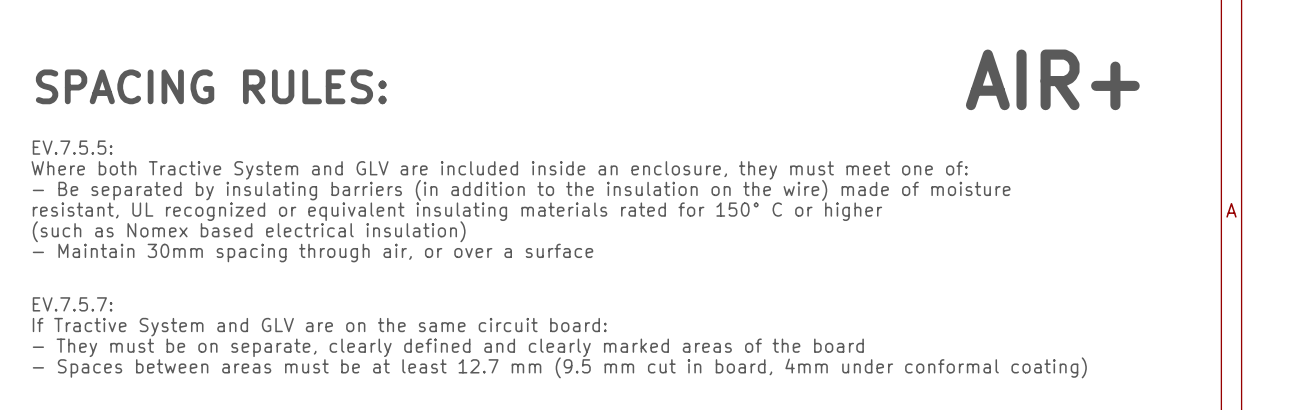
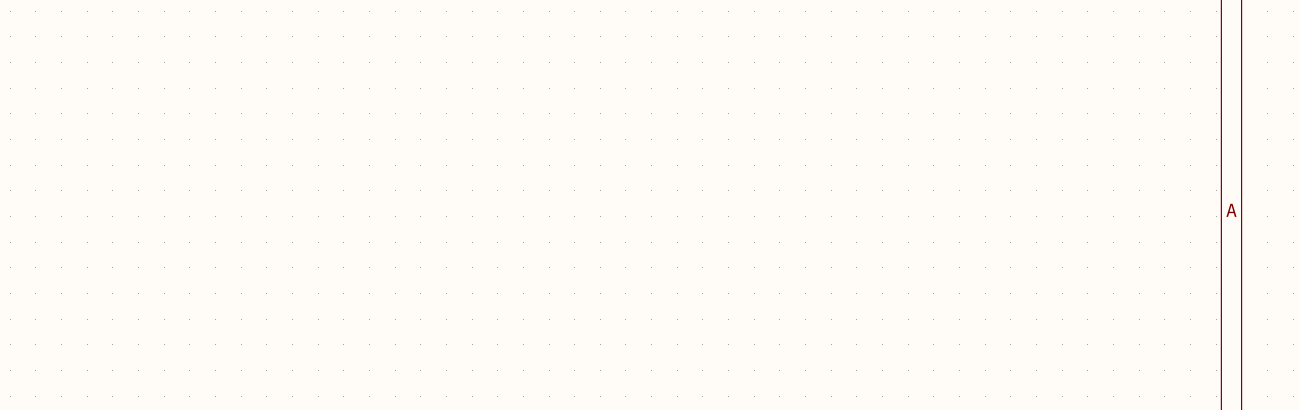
text: AIR+ (1052, 79) -> none
text: SPACING RULES: (211, 86) -> none
text: EV.7.5.5: (72, 147) -> none
text: Where both Tractive System and GLV are included inside an enclosure, they must meet one of: (499, 170) -> none
text: - Be separated by insulating barriers (in addition to the insulation on the wire) made of moisture (521, 190) -> none
text: resistant, UL recognized or equivalent insulating materials rated for 150° C or higher (457, 211) -> none
text: (such as Nomex based electrical insulation) (249, 231) -> none
text: - Maintain 30mm spacing through air, or over a surface (312, 253) -> none
text: EV.7.5.7: (72, 304) -> none
text: If Tractive System and GLV are on the same circuit board: (319, 327) -> none
text: - They must be on separate, clearly defined and clearly marked areas of the board (448, 347) -> none
text: - Spaces between areas must be at least 12.7 mm (9.5 mm cut in board, 4mm under conformal coating) (559, 367) -> none

